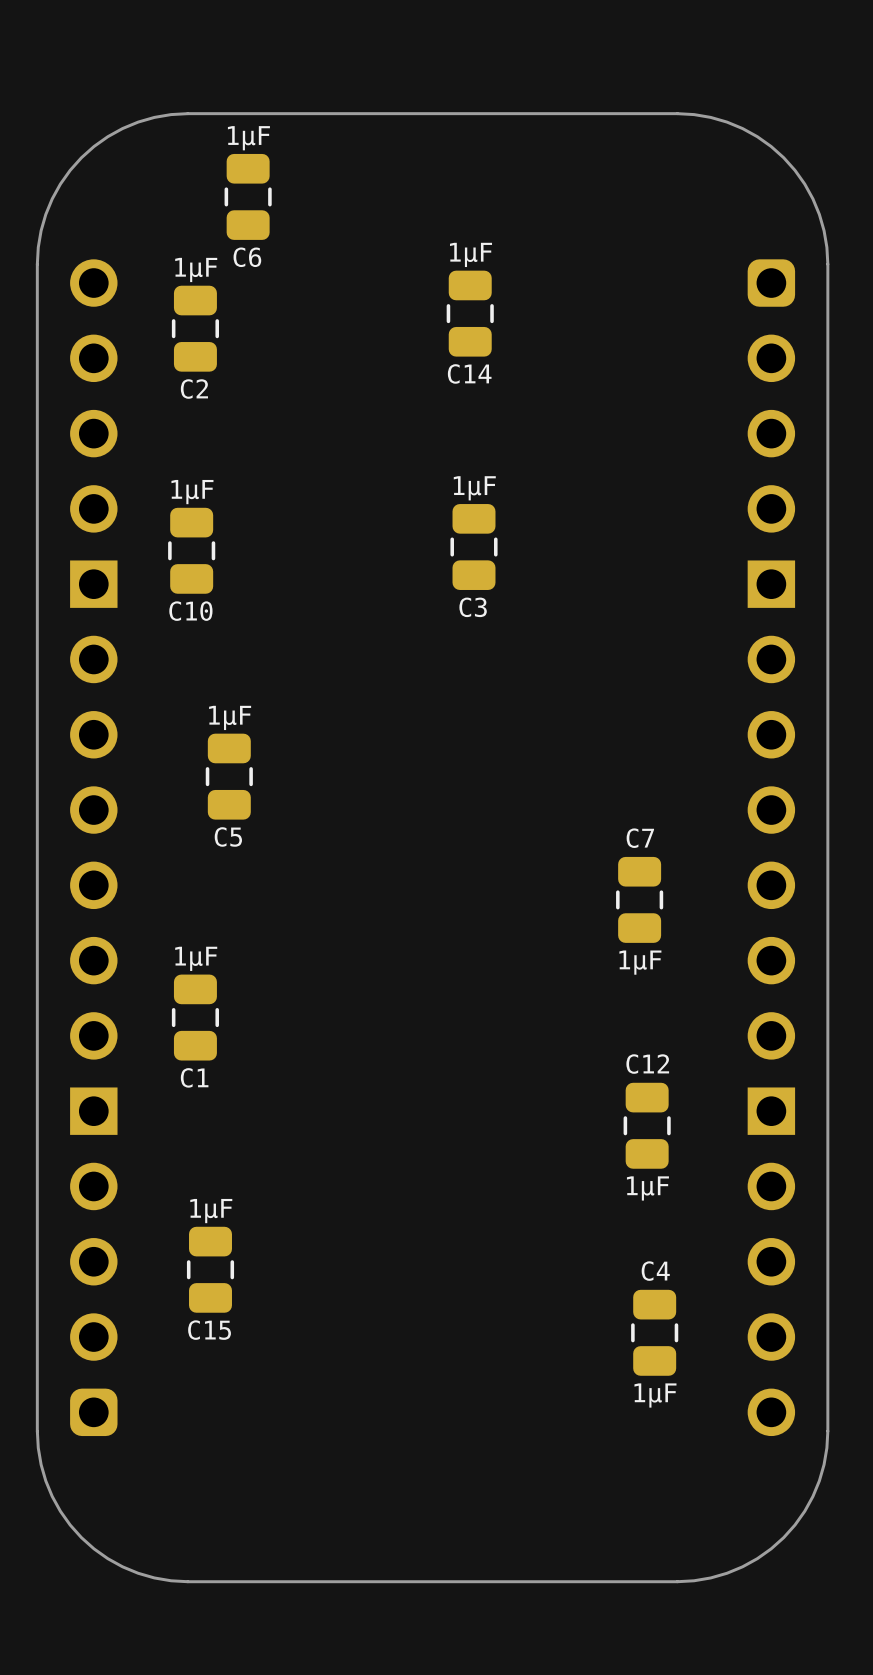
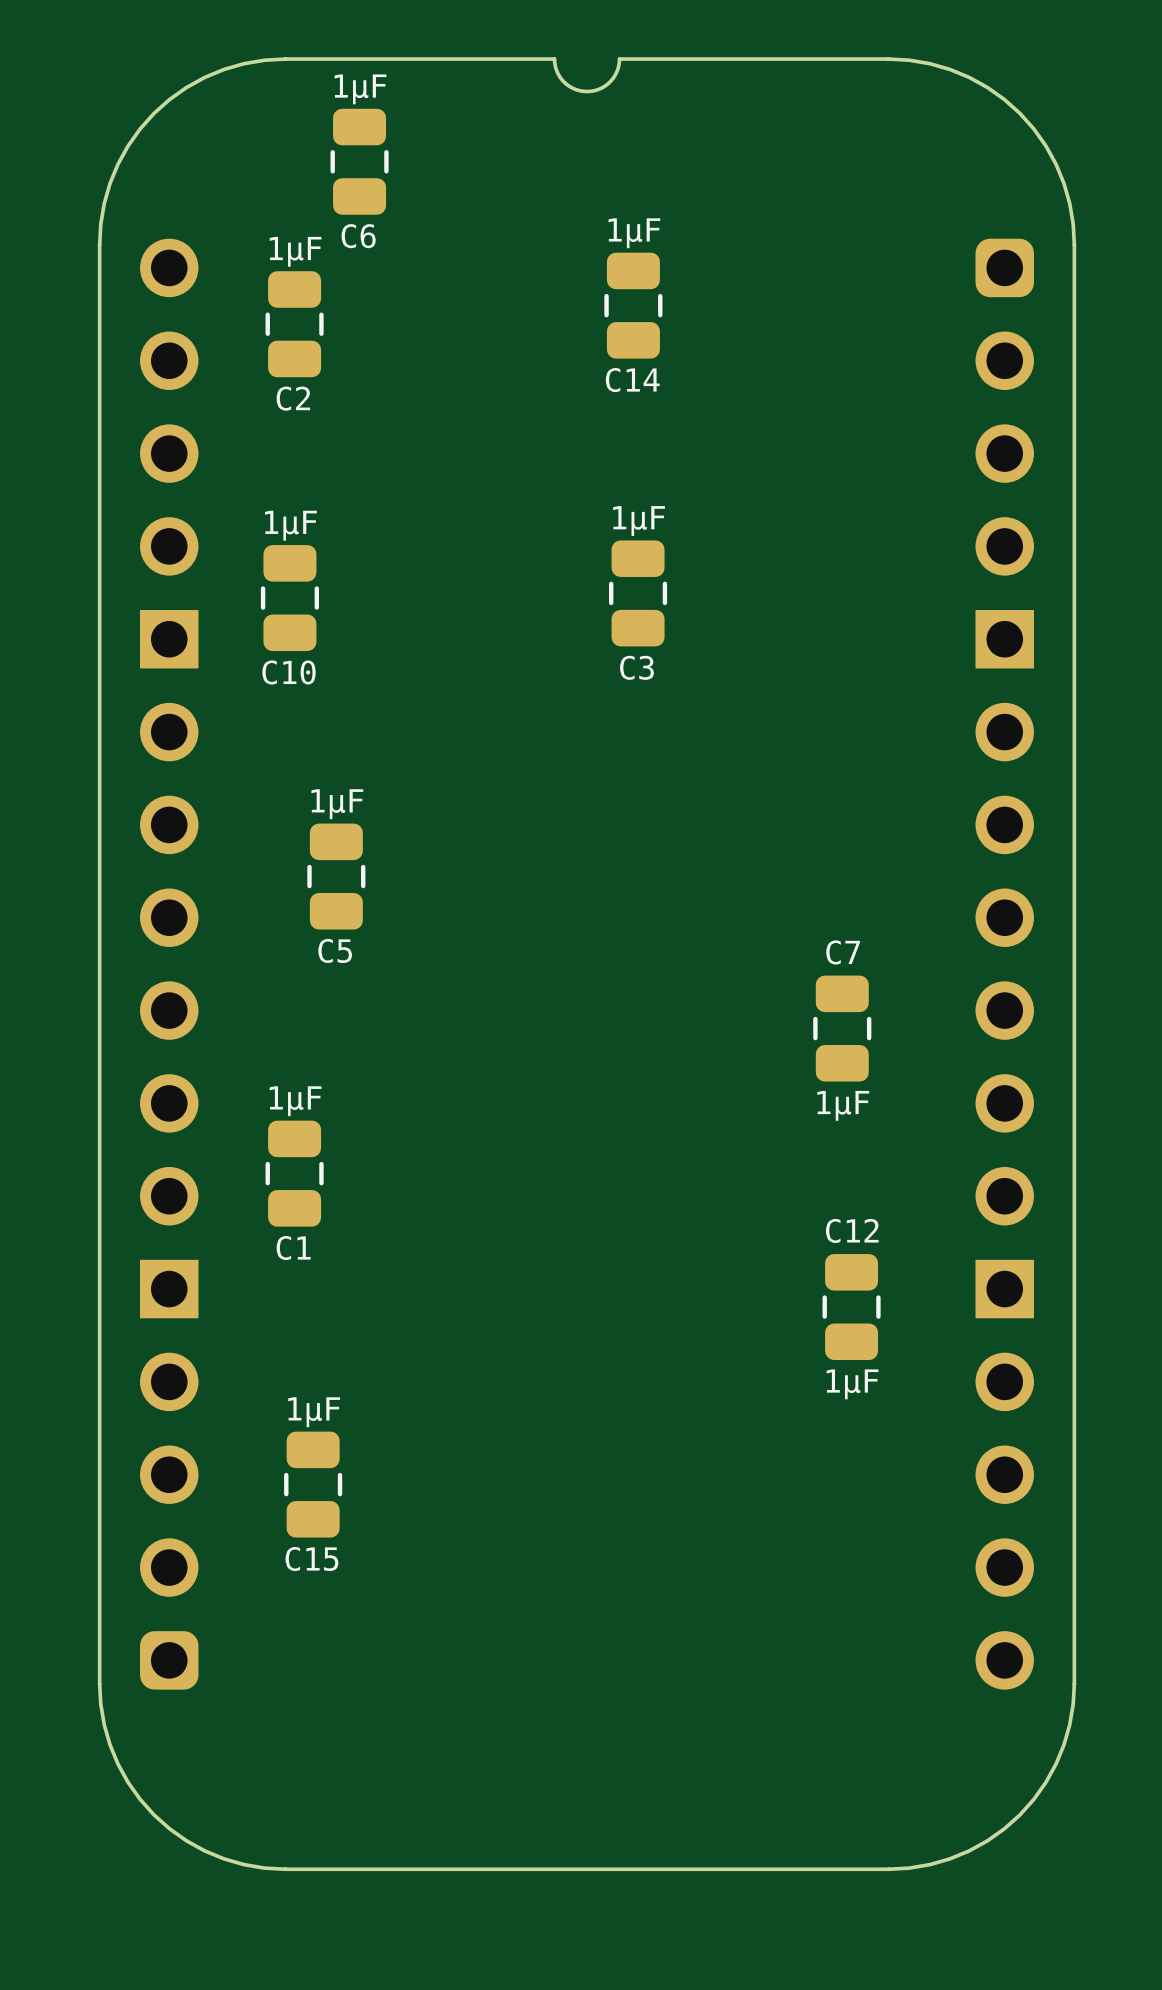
part footprint: [35, 112, 830, 1584] -> [97, 57, 1077, 1872]
C4: 1μF (654, 1332) -> none

